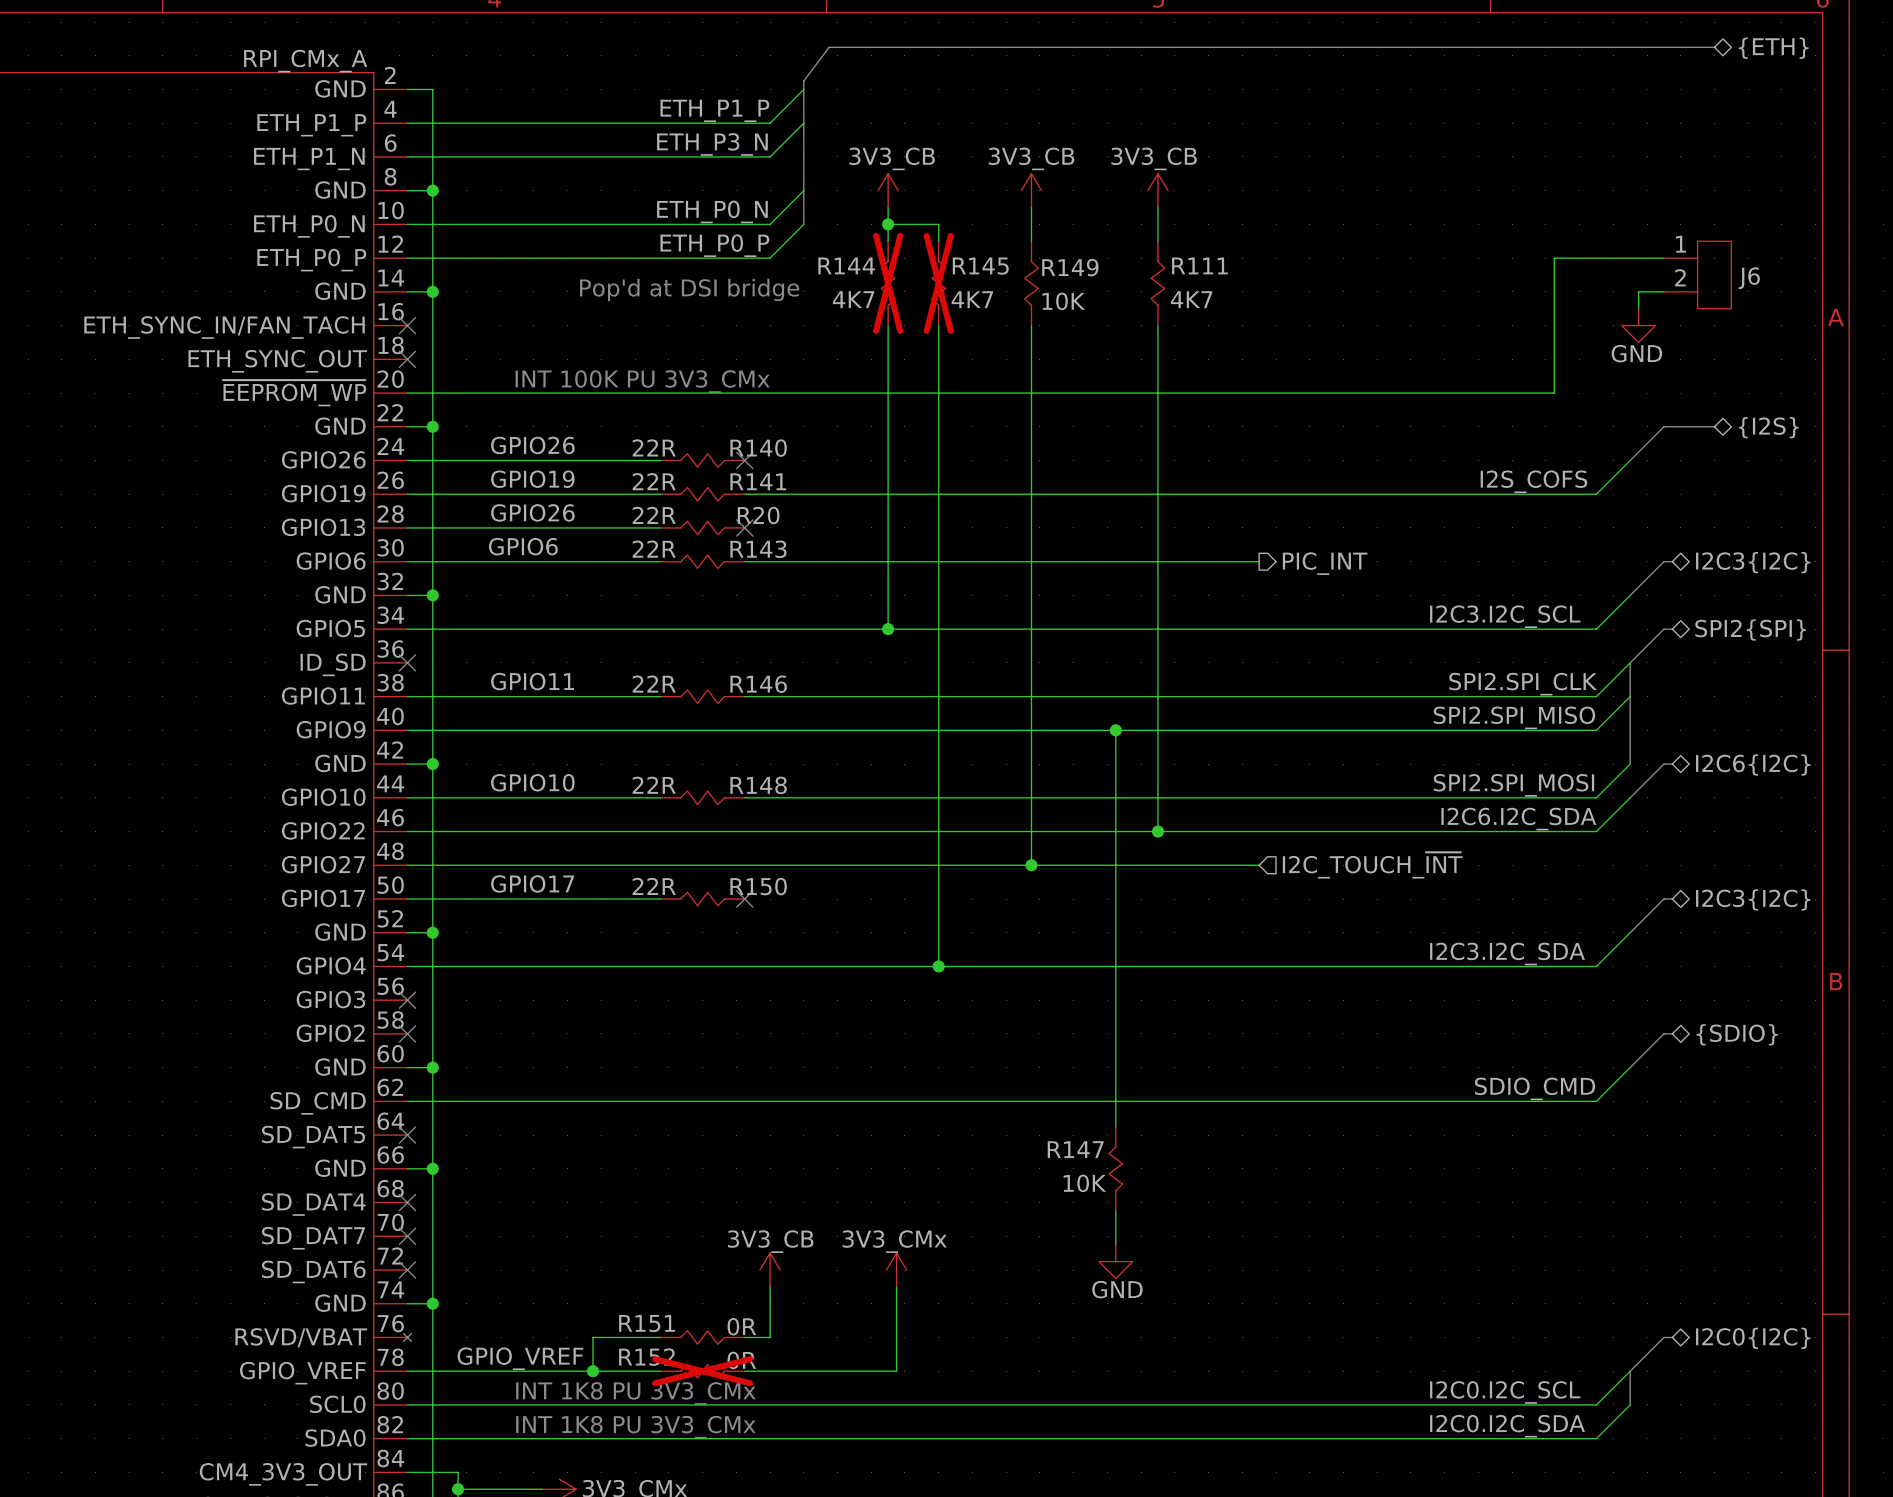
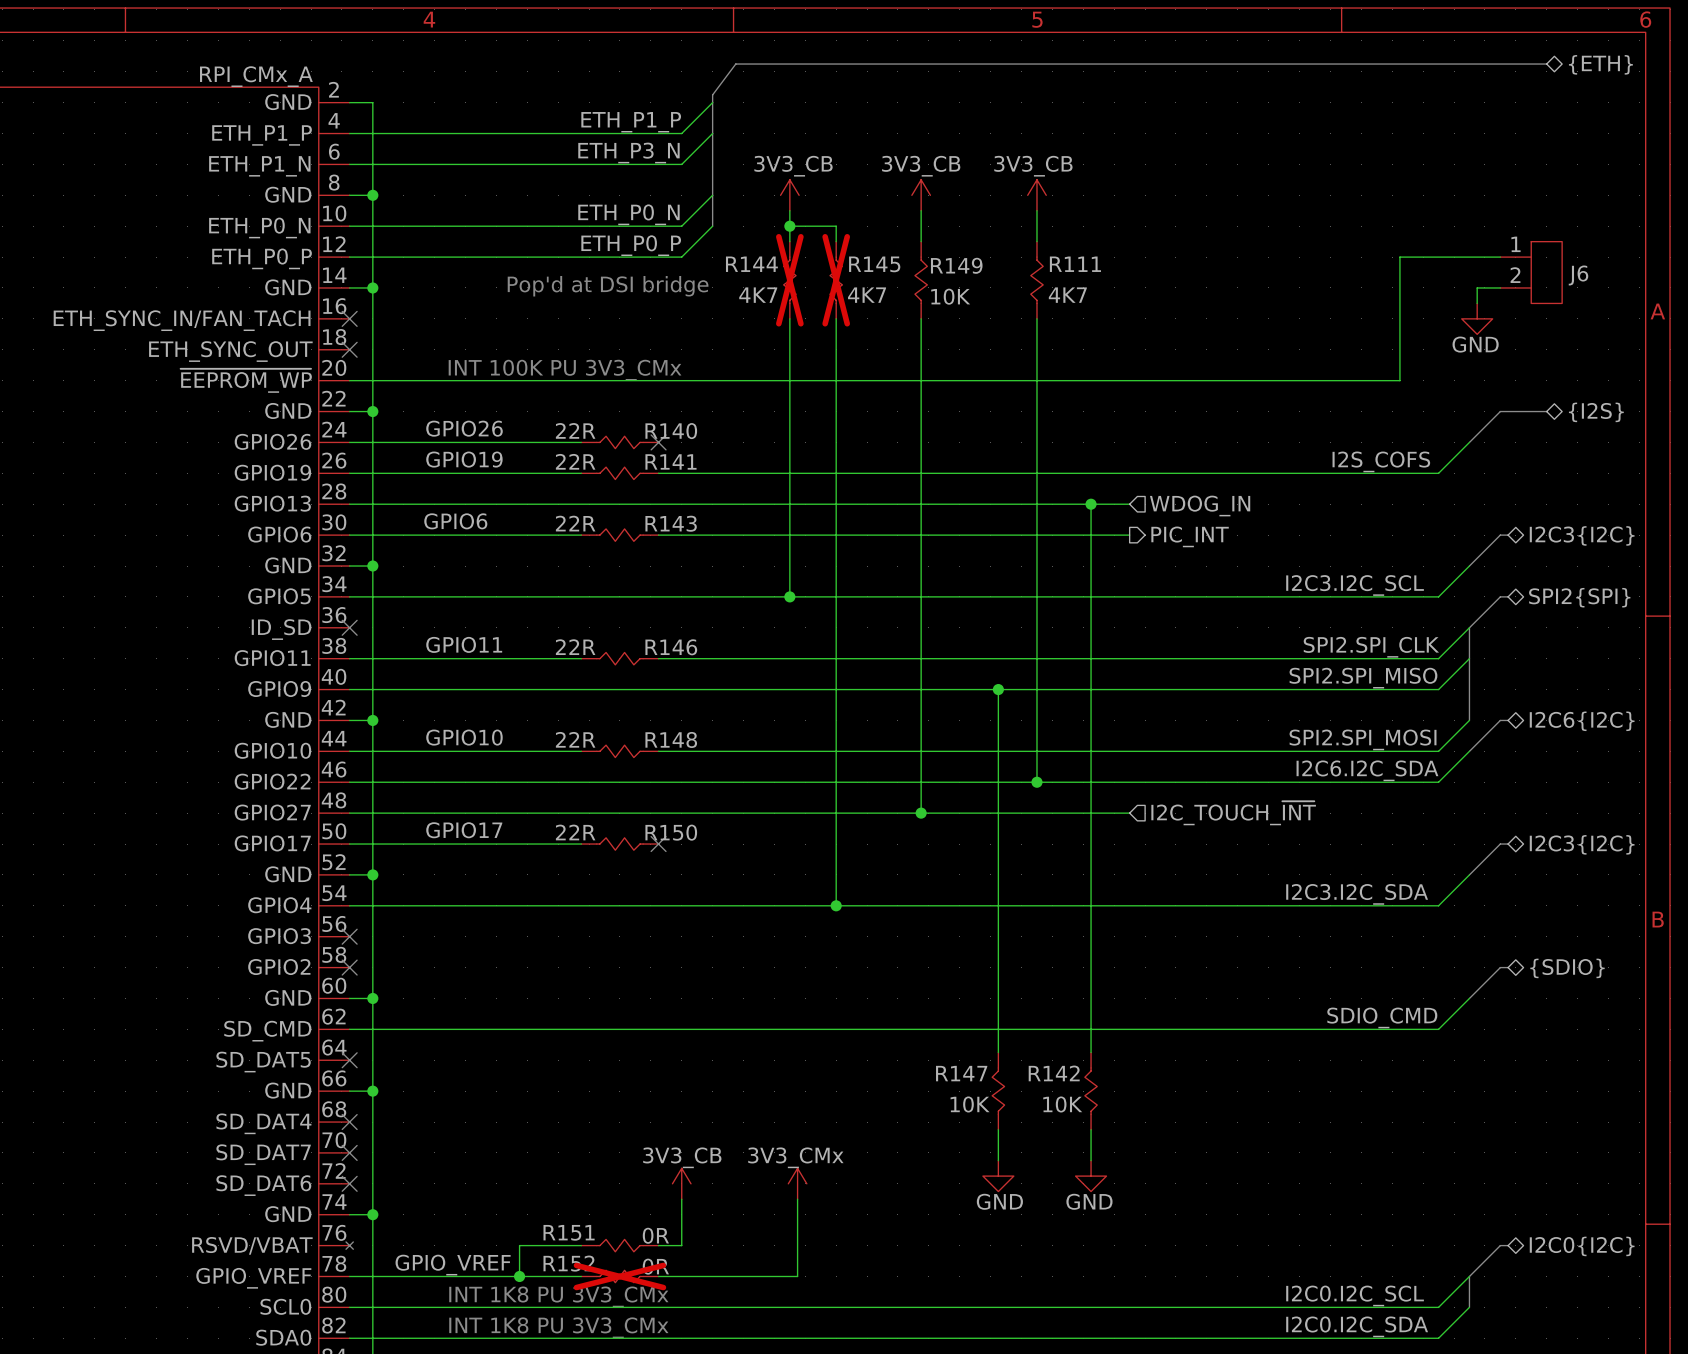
label: GPIO26 (532, 512) -> none
wire: none -> (581, 504) (1129, 504)
R20: 22R (702, 527) -> none
no-connect mark: (744, 527) -> none
wire: none -> (1091, 504) (1091, 1052)
junction: none -> (1091, 504)
hierarchical label: none -> WDOG_IN (1200, 506)
R142: none -> 10K (1091, 1091)
wire: none -> (1091, 1129) (1091, 1160)
power symbol: none -> GND (1091, 1176)

